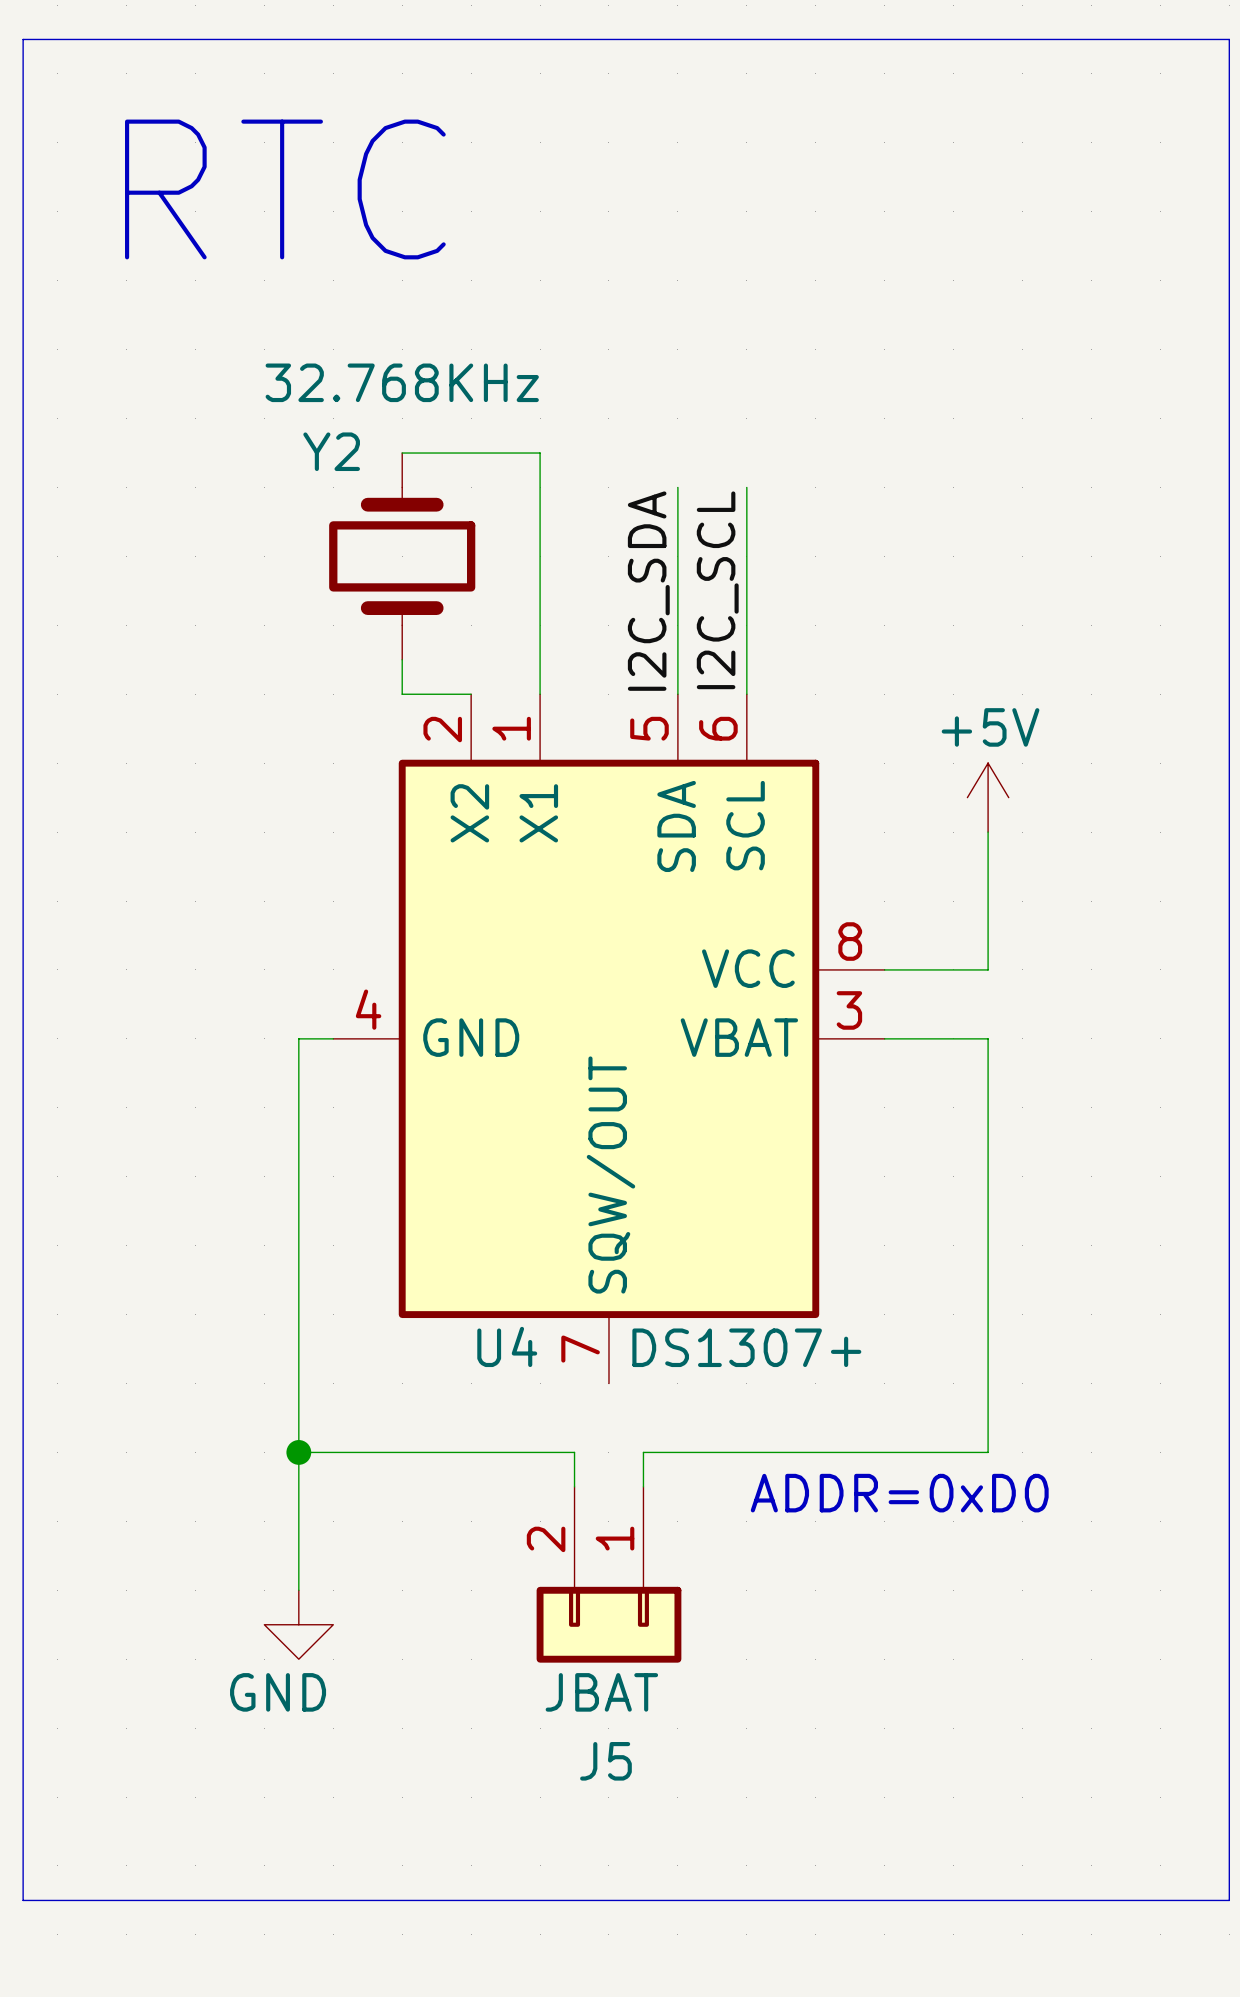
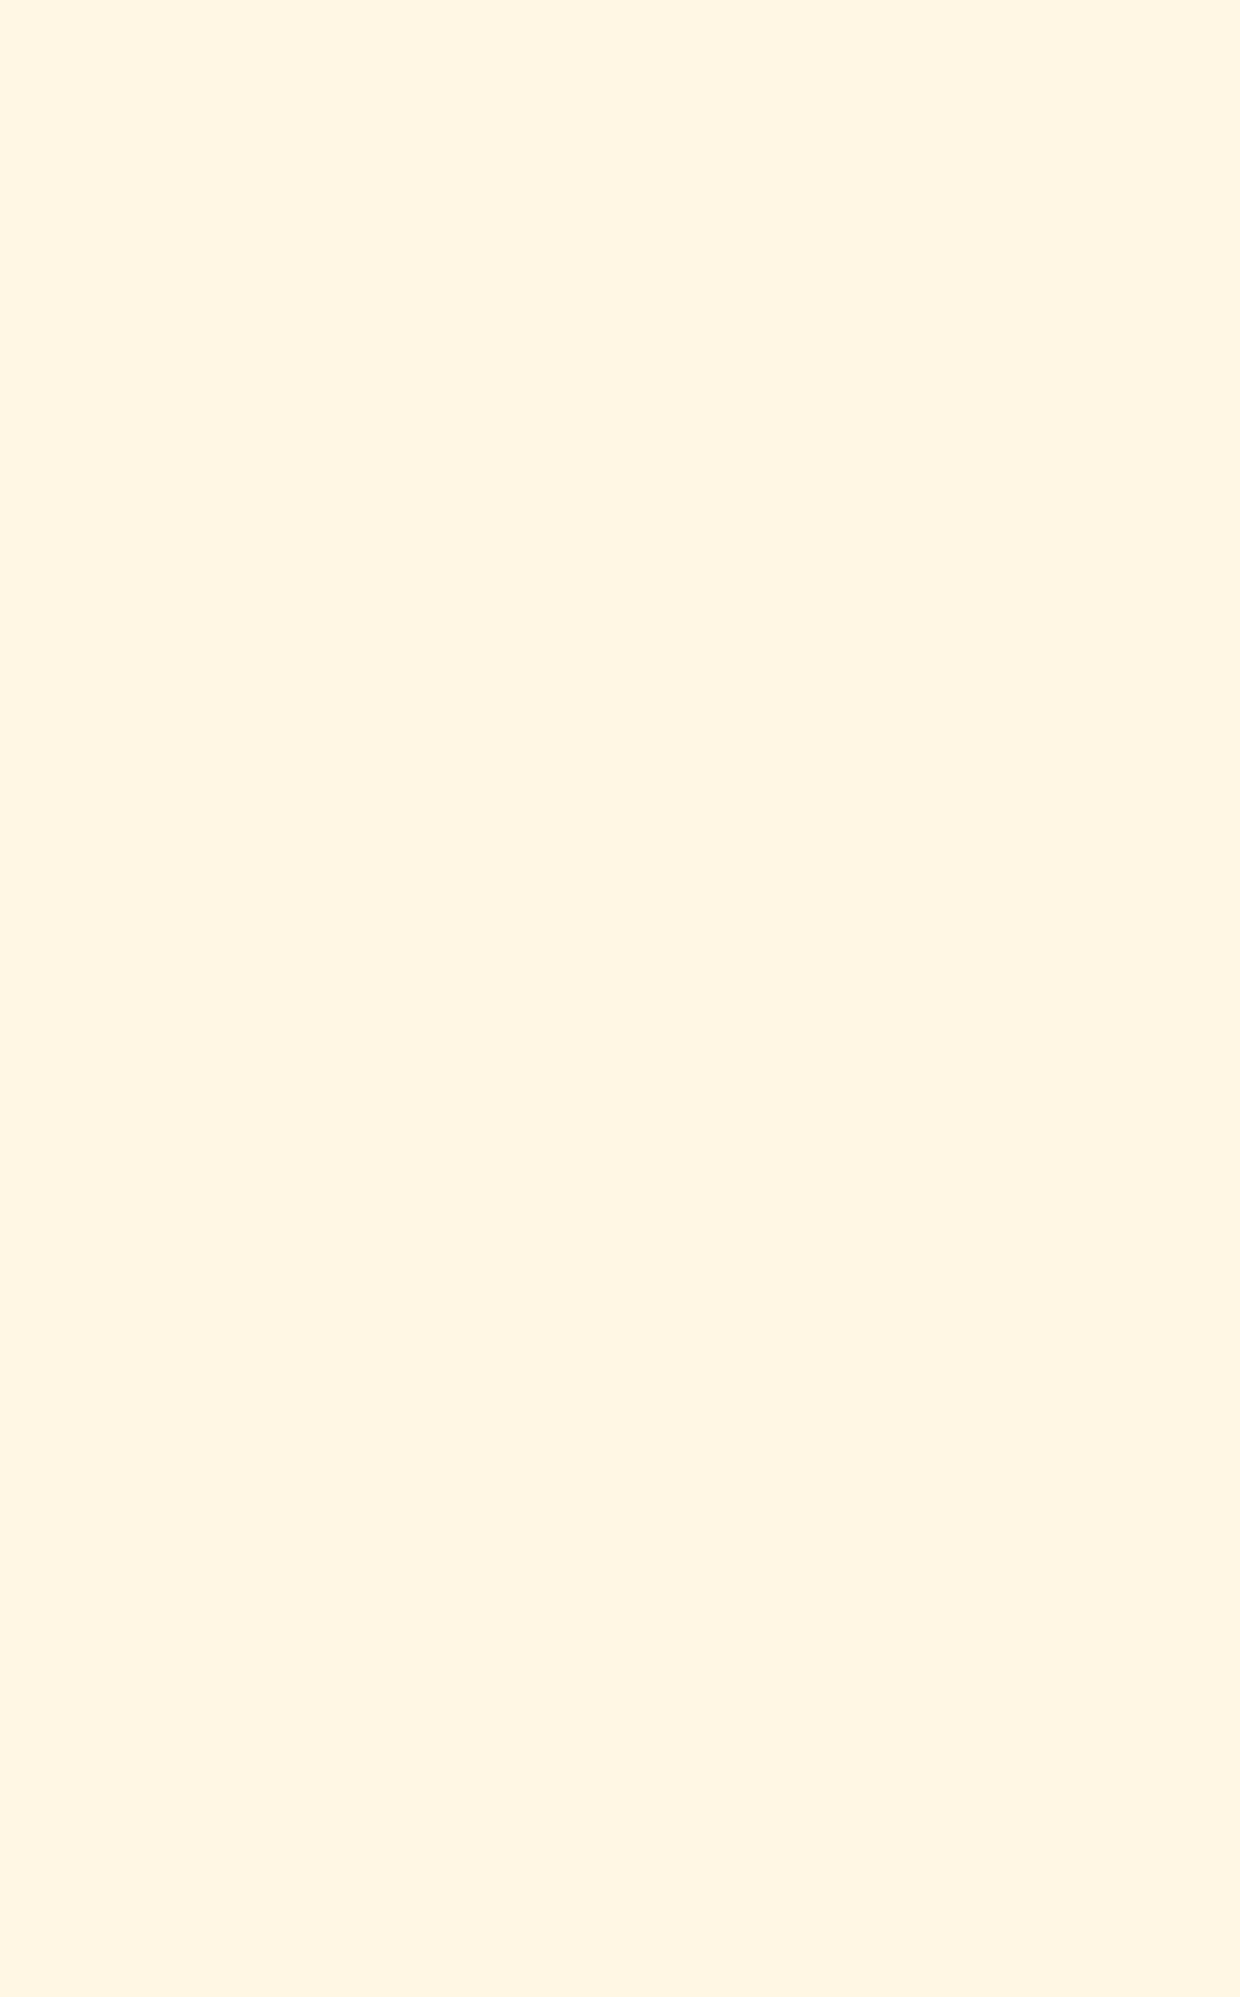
line: (23, 39) (23, 1900) (1229, 1900) (1229, 39) (23, 39) -> none
text: RTC (285, 189) -> none
wire: (402, 453) (540, 453) (540, 694) -> none
wire: (677, 487) (677, 694) -> none
wire: (746, 487) (746, 694) -> none
Y2: 32.768KHz (402, 556) -> none
label: I2C_SCL (717, 590) -> none
label: I2C_SDA (648, 591) -> none
wire: (402, 659) (402, 694) (471, 694) -> none
power symbol: +5V (988, 797) -> none
wire: (988, 832) (988, 969) (884, 969) -> none
wire: (333, 1038) (298, 1038) (298, 1590) -> none
U4: DS1307+ (608, 1038) -> none
wire: (884, 1038) (988, 1038) (988, 1452) (643, 1452) (643, 1486) -> none
wire: (298, 1452) (574, 1452) (574, 1486) -> none
junction: (298, 1452) -> none
text: ADDR=0xD0 (899, 1493) -> none
J5: JBAT (608, 1574) -> none
power symbol: GND (298, 1624) -> none

